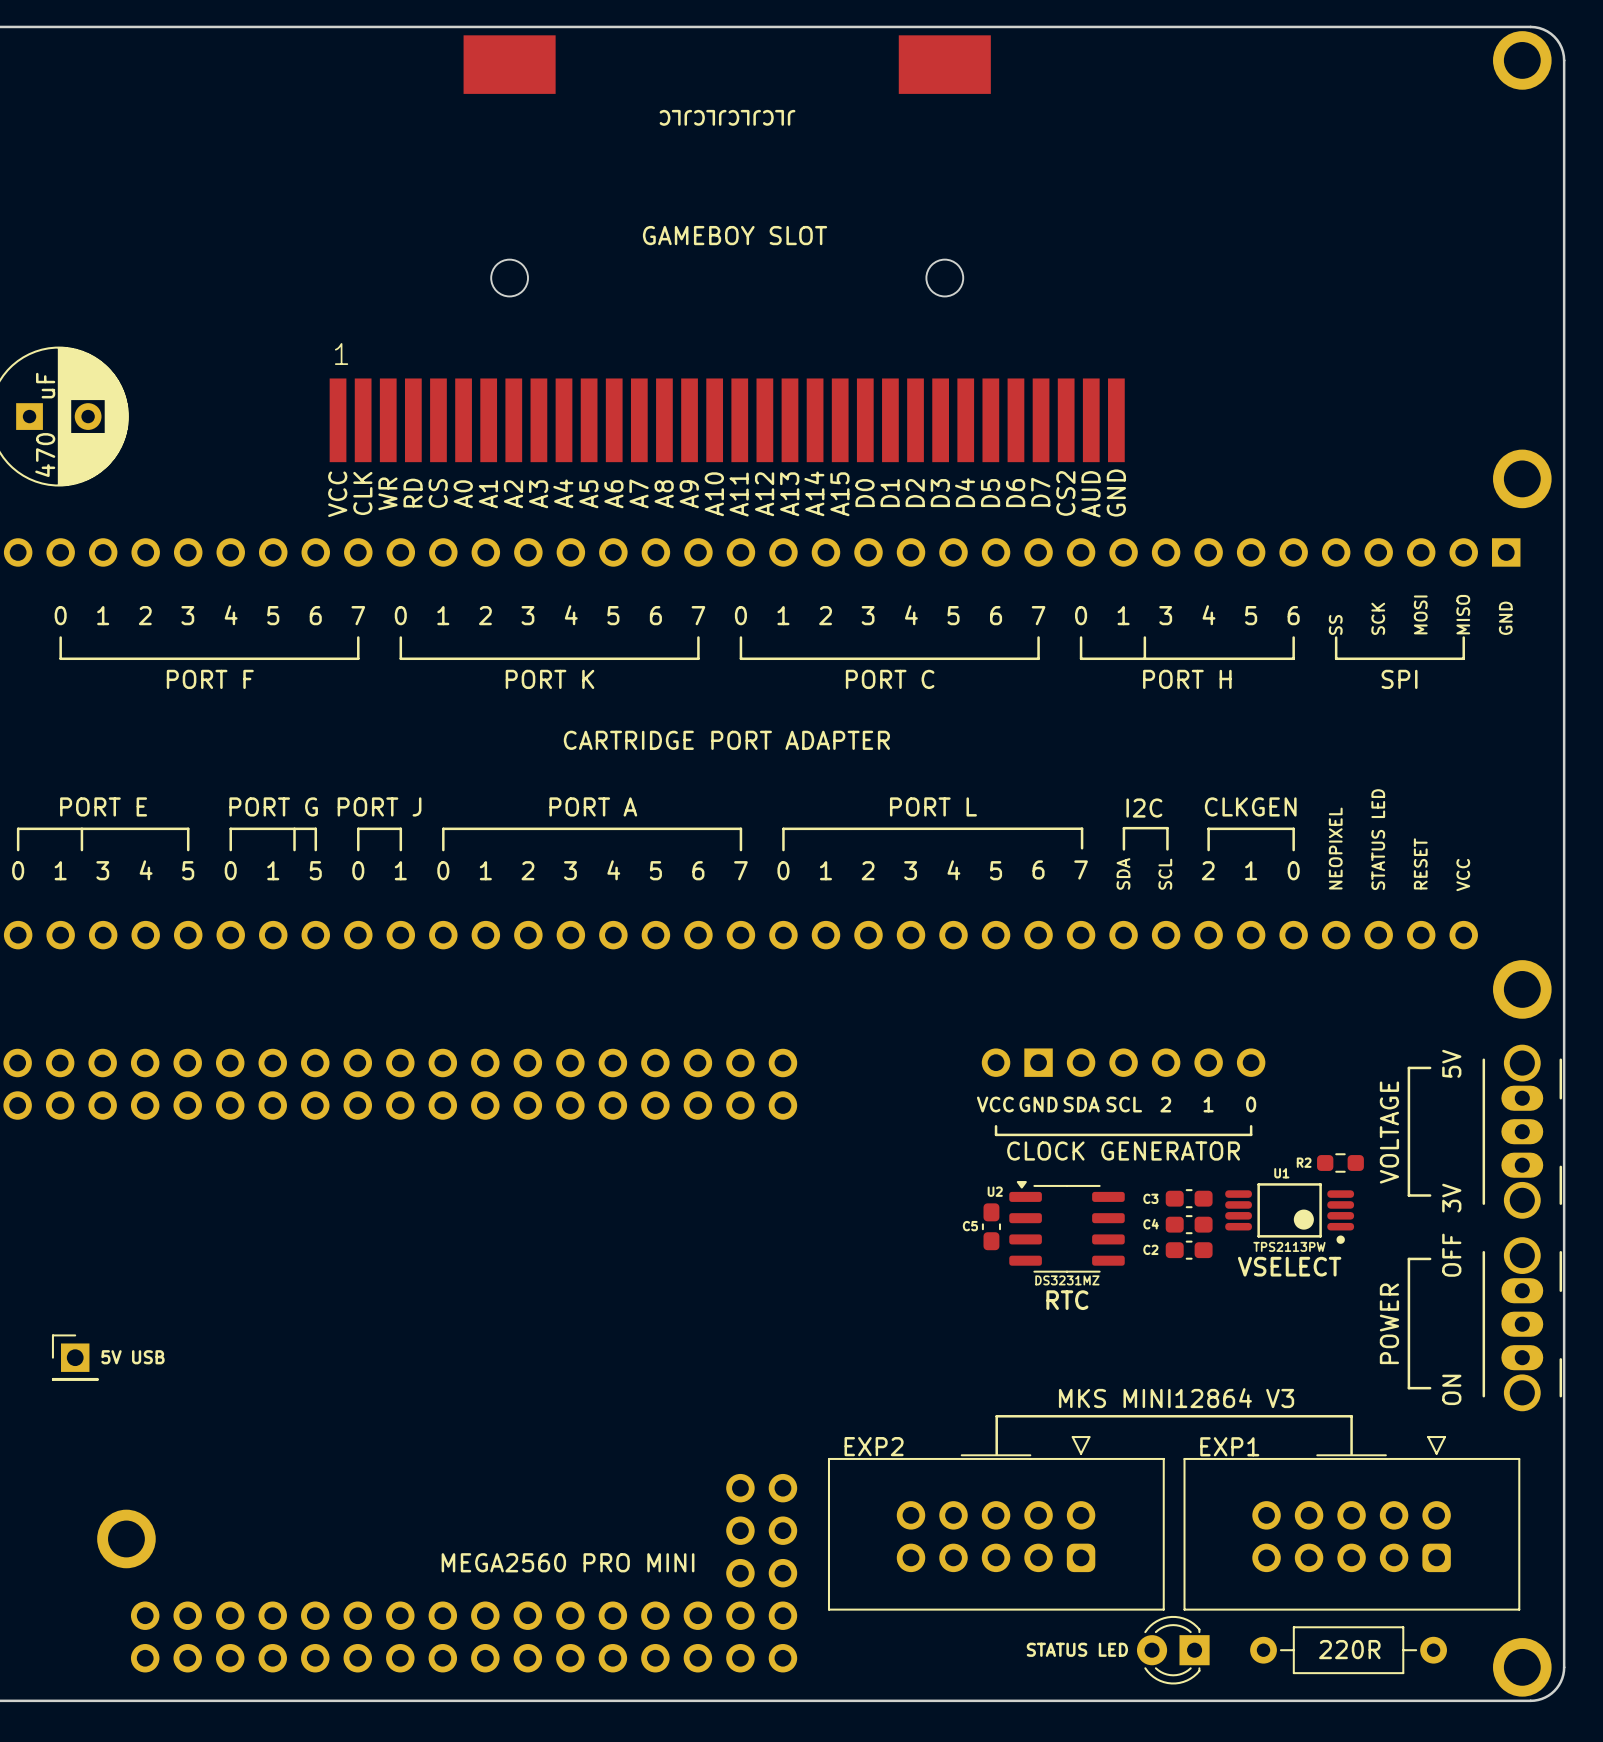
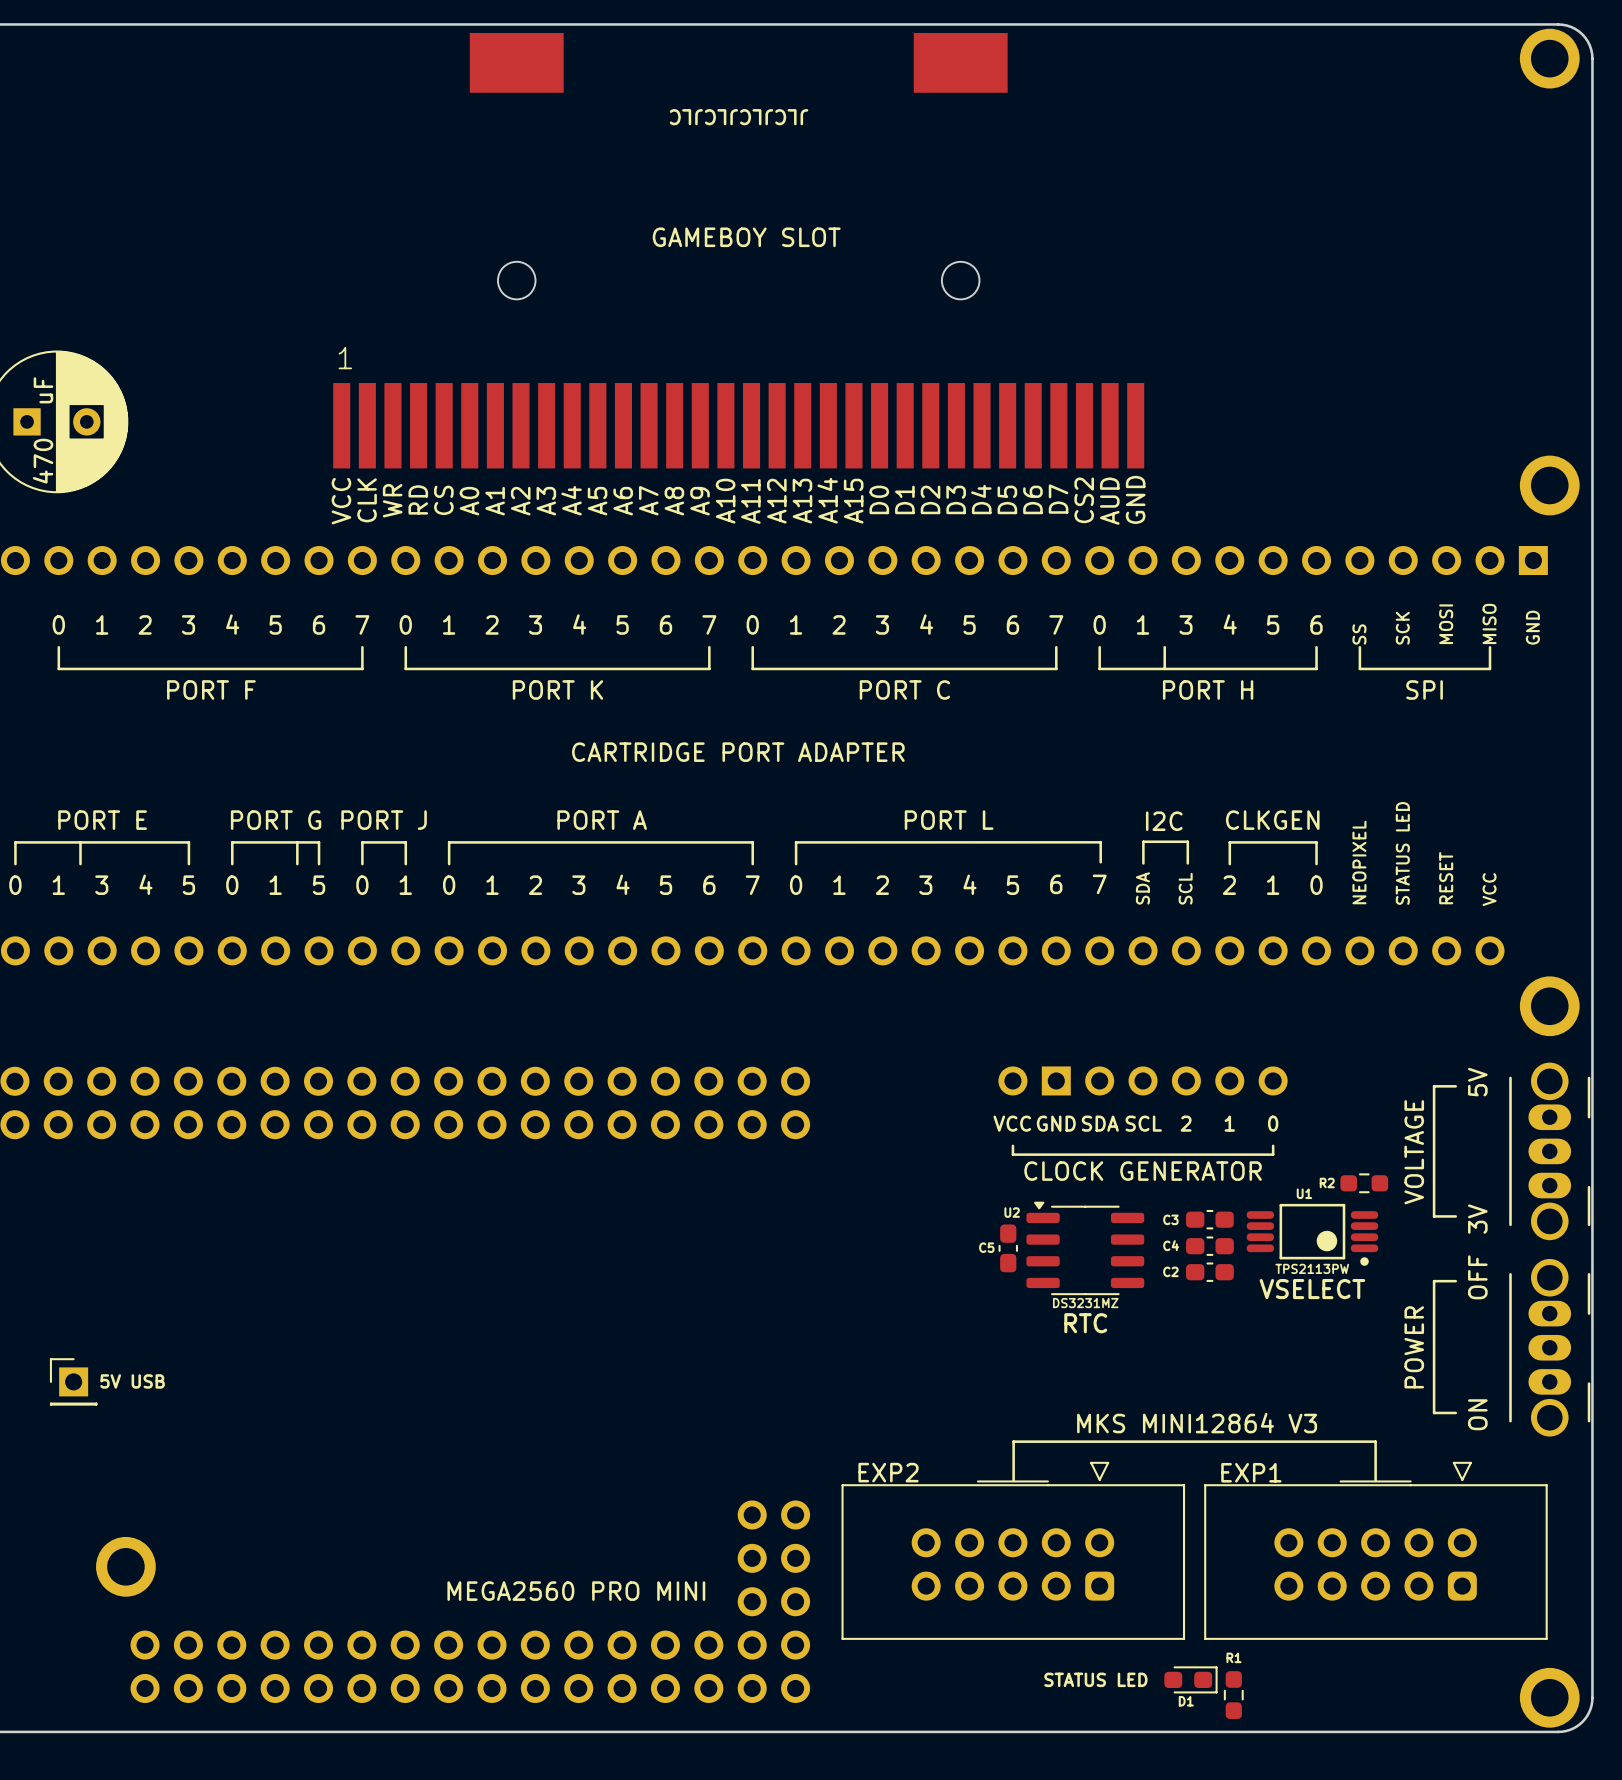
D1: none -> (1190, 1679)
text: 220R (1349, 1649) -> none
part: (1173, 1650) -> none
part: (1348, 1650) -> none
R1: none -> (1233, 1695)

